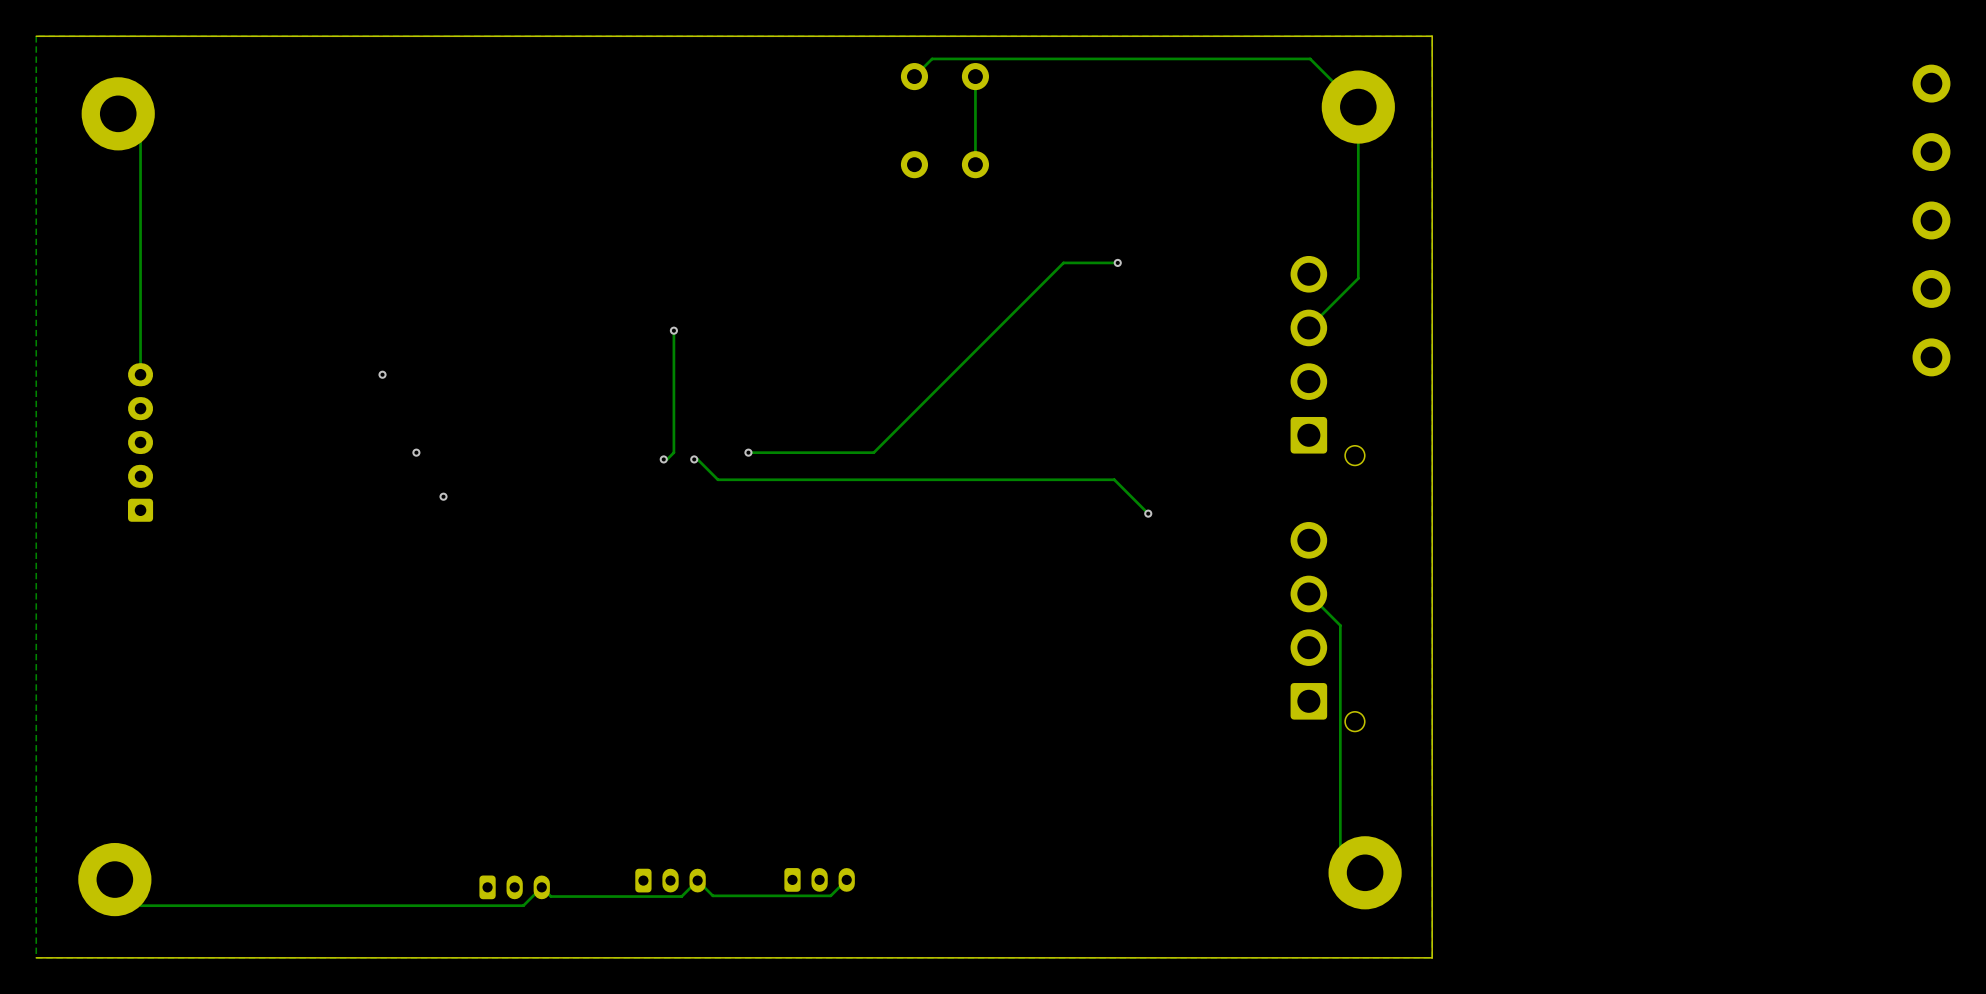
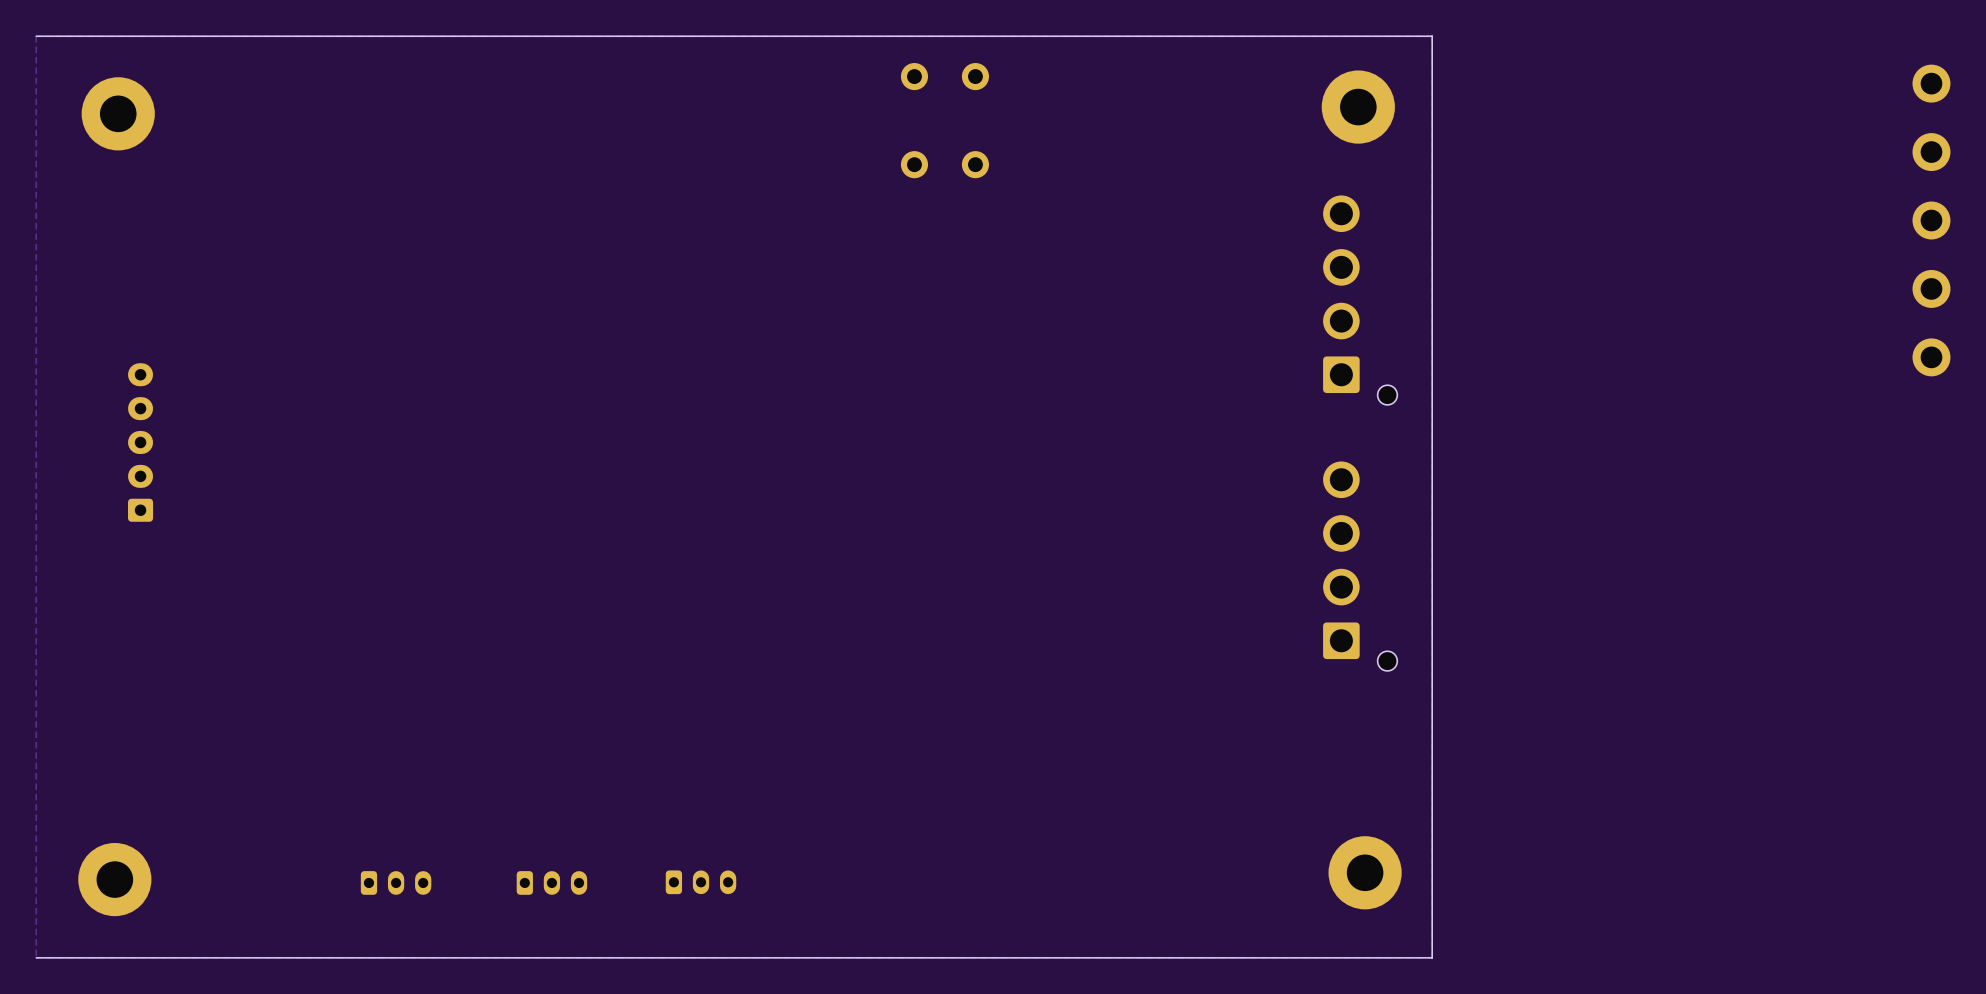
track: (914, 76) (932, 58) (1310, 58) (1358, 107) (1358, 278) (1308, 327) -> none
track: (975, 76) (975, 164) -> none
track: (118, 113) (140, 136) (140, 374) -> none
track: (1117, 262) (1063, 262) (873, 452) (748, 452) -> none
via: (1117, 262) -> none
track: (673, 330) (673, 452) (667, 459) (663, 459) -> none
via: (673, 330) -> none
part position: (1327, 360) -> (1360, 300)
via: (382, 374) -> none
via: (416, 452) -> none
via: (748, 452) -> none
via: (663, 459) -> none
track: (694, 459) (697, 459) (717, 479) (1114, 479) (1148, 513) -> none
via: (694, 459) -> none
via: (443, 496) -> none
via: (1148, 513) -> none
track: (1308, 593) (1340, 625) (1340, 848) (1365, 872) -> none
part position: (1327, 626) -> (1360, 566)
track: (114, 879) (140, 905) (523, 905) (541, 887) (550, 896) (681, 896) (697, 880) (712, 895) (830, 895) (846, 879) -> none
part: (819, 879) -> none
part position: (670, 880) -> (701, 882)
part: none -> (396, 882)
part position: (514, 887) -> (551, 882)

